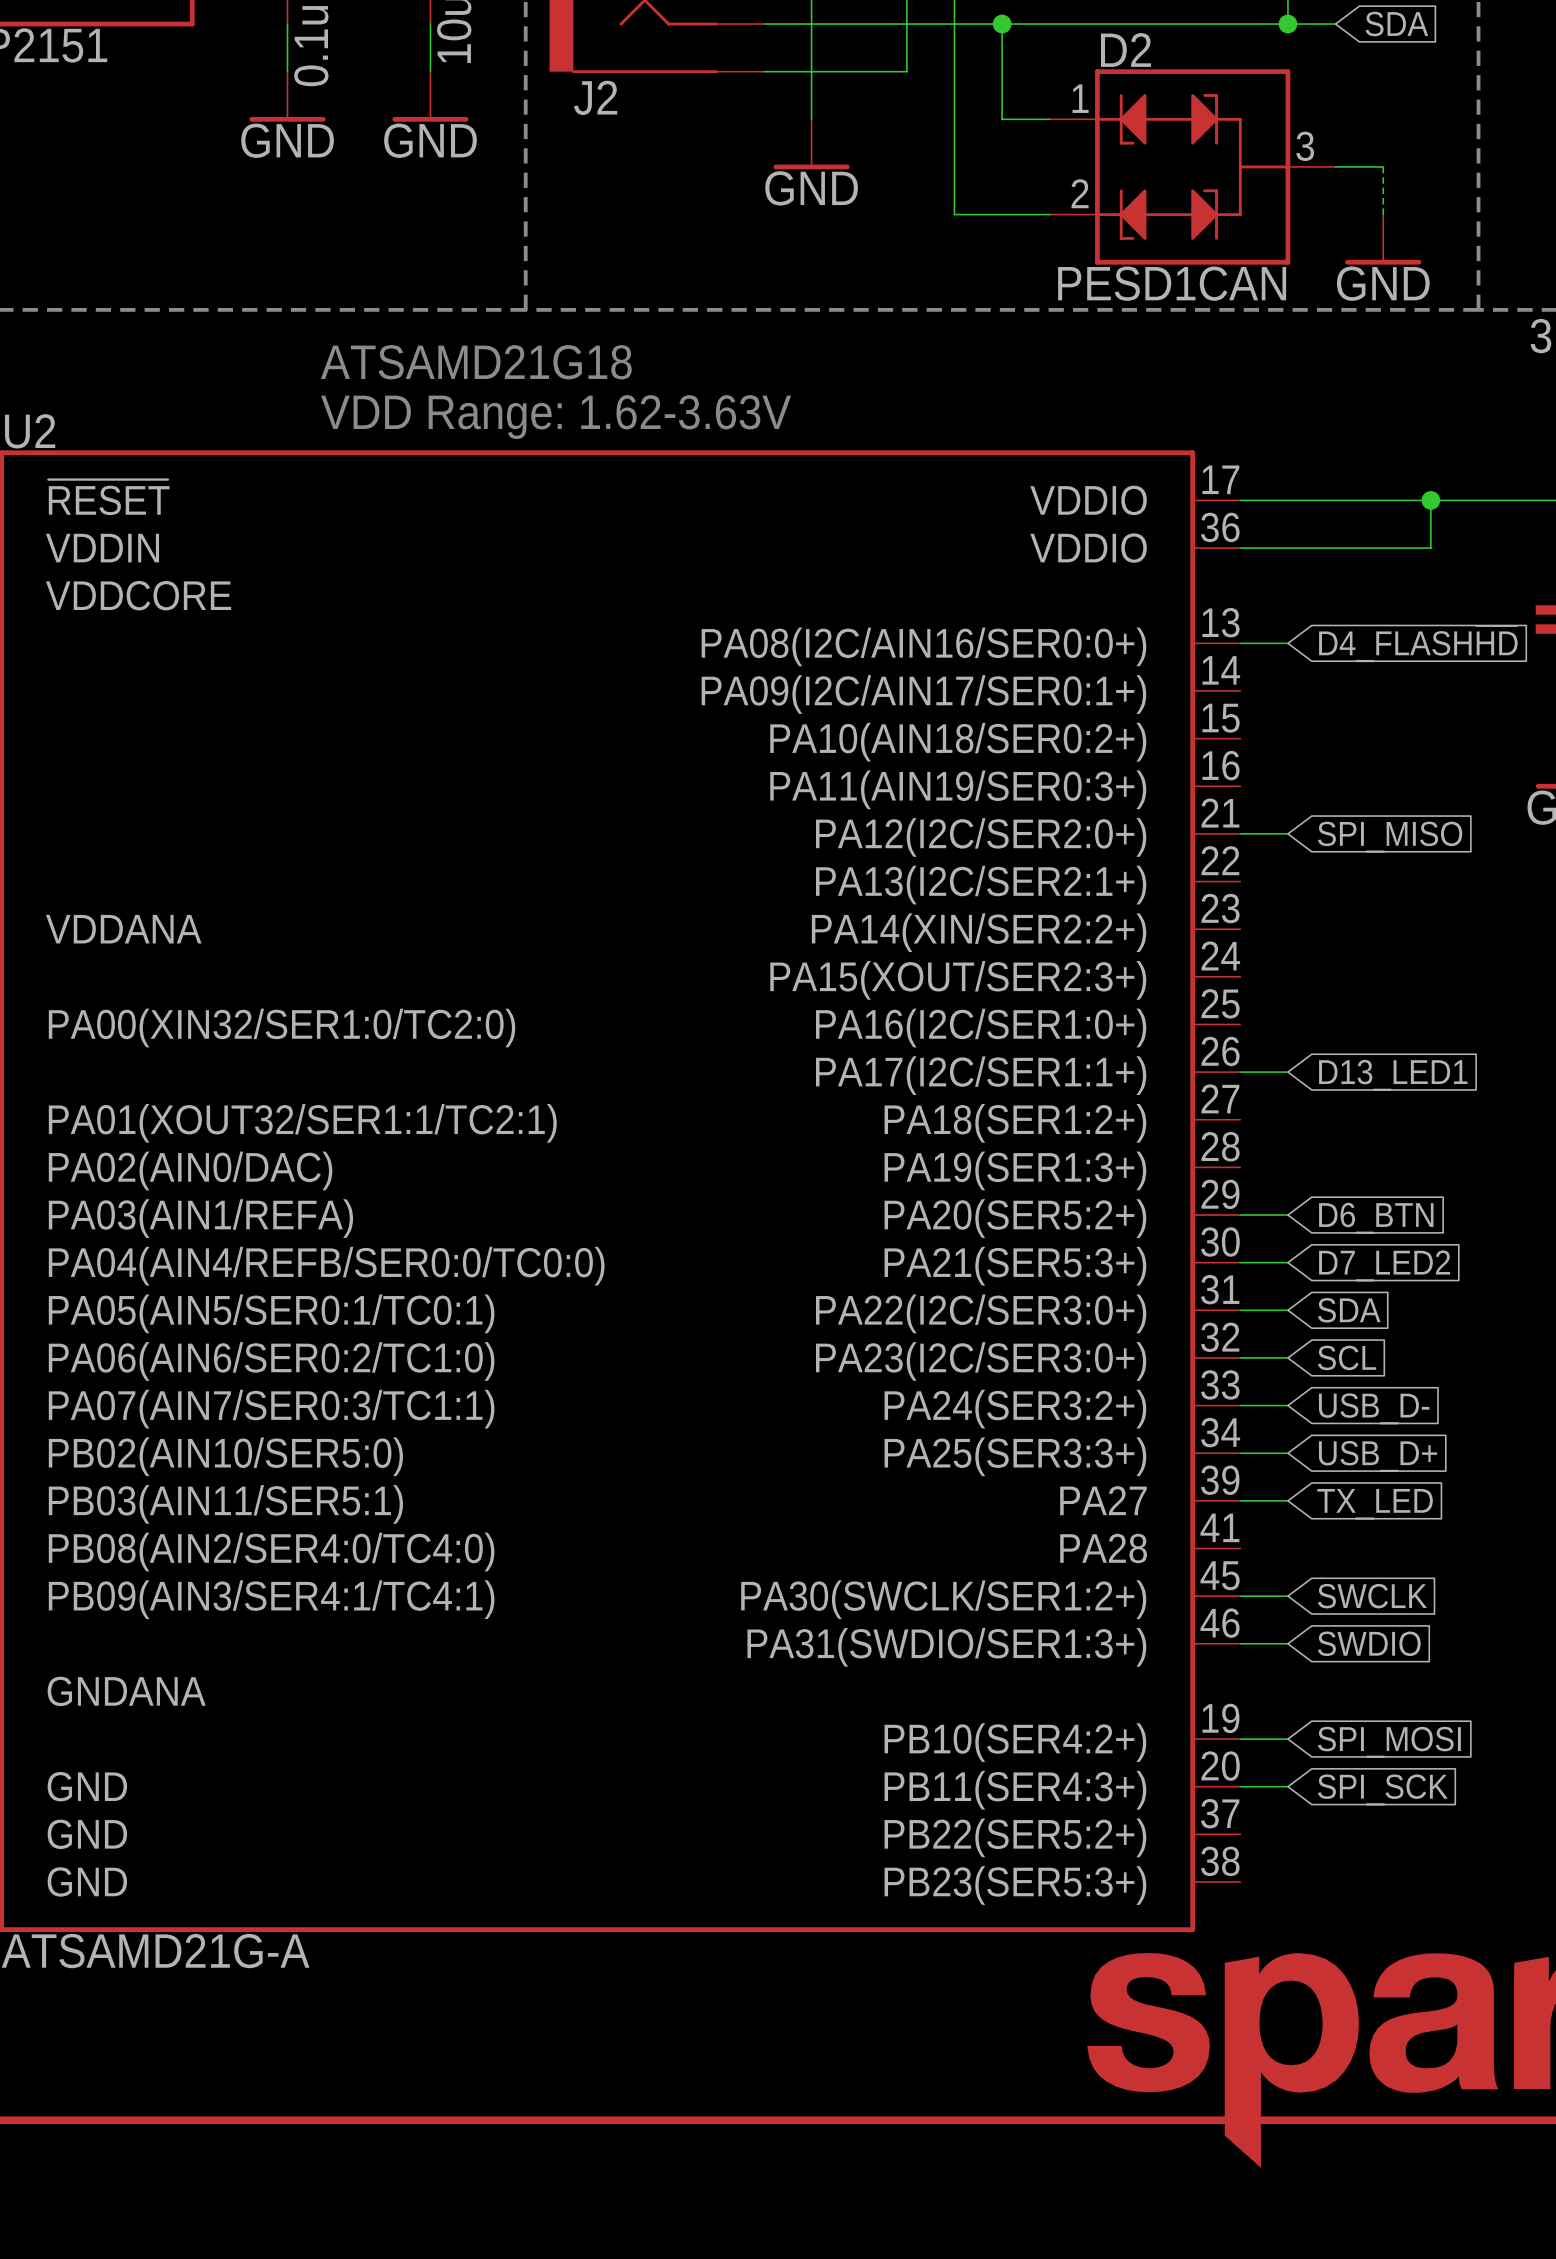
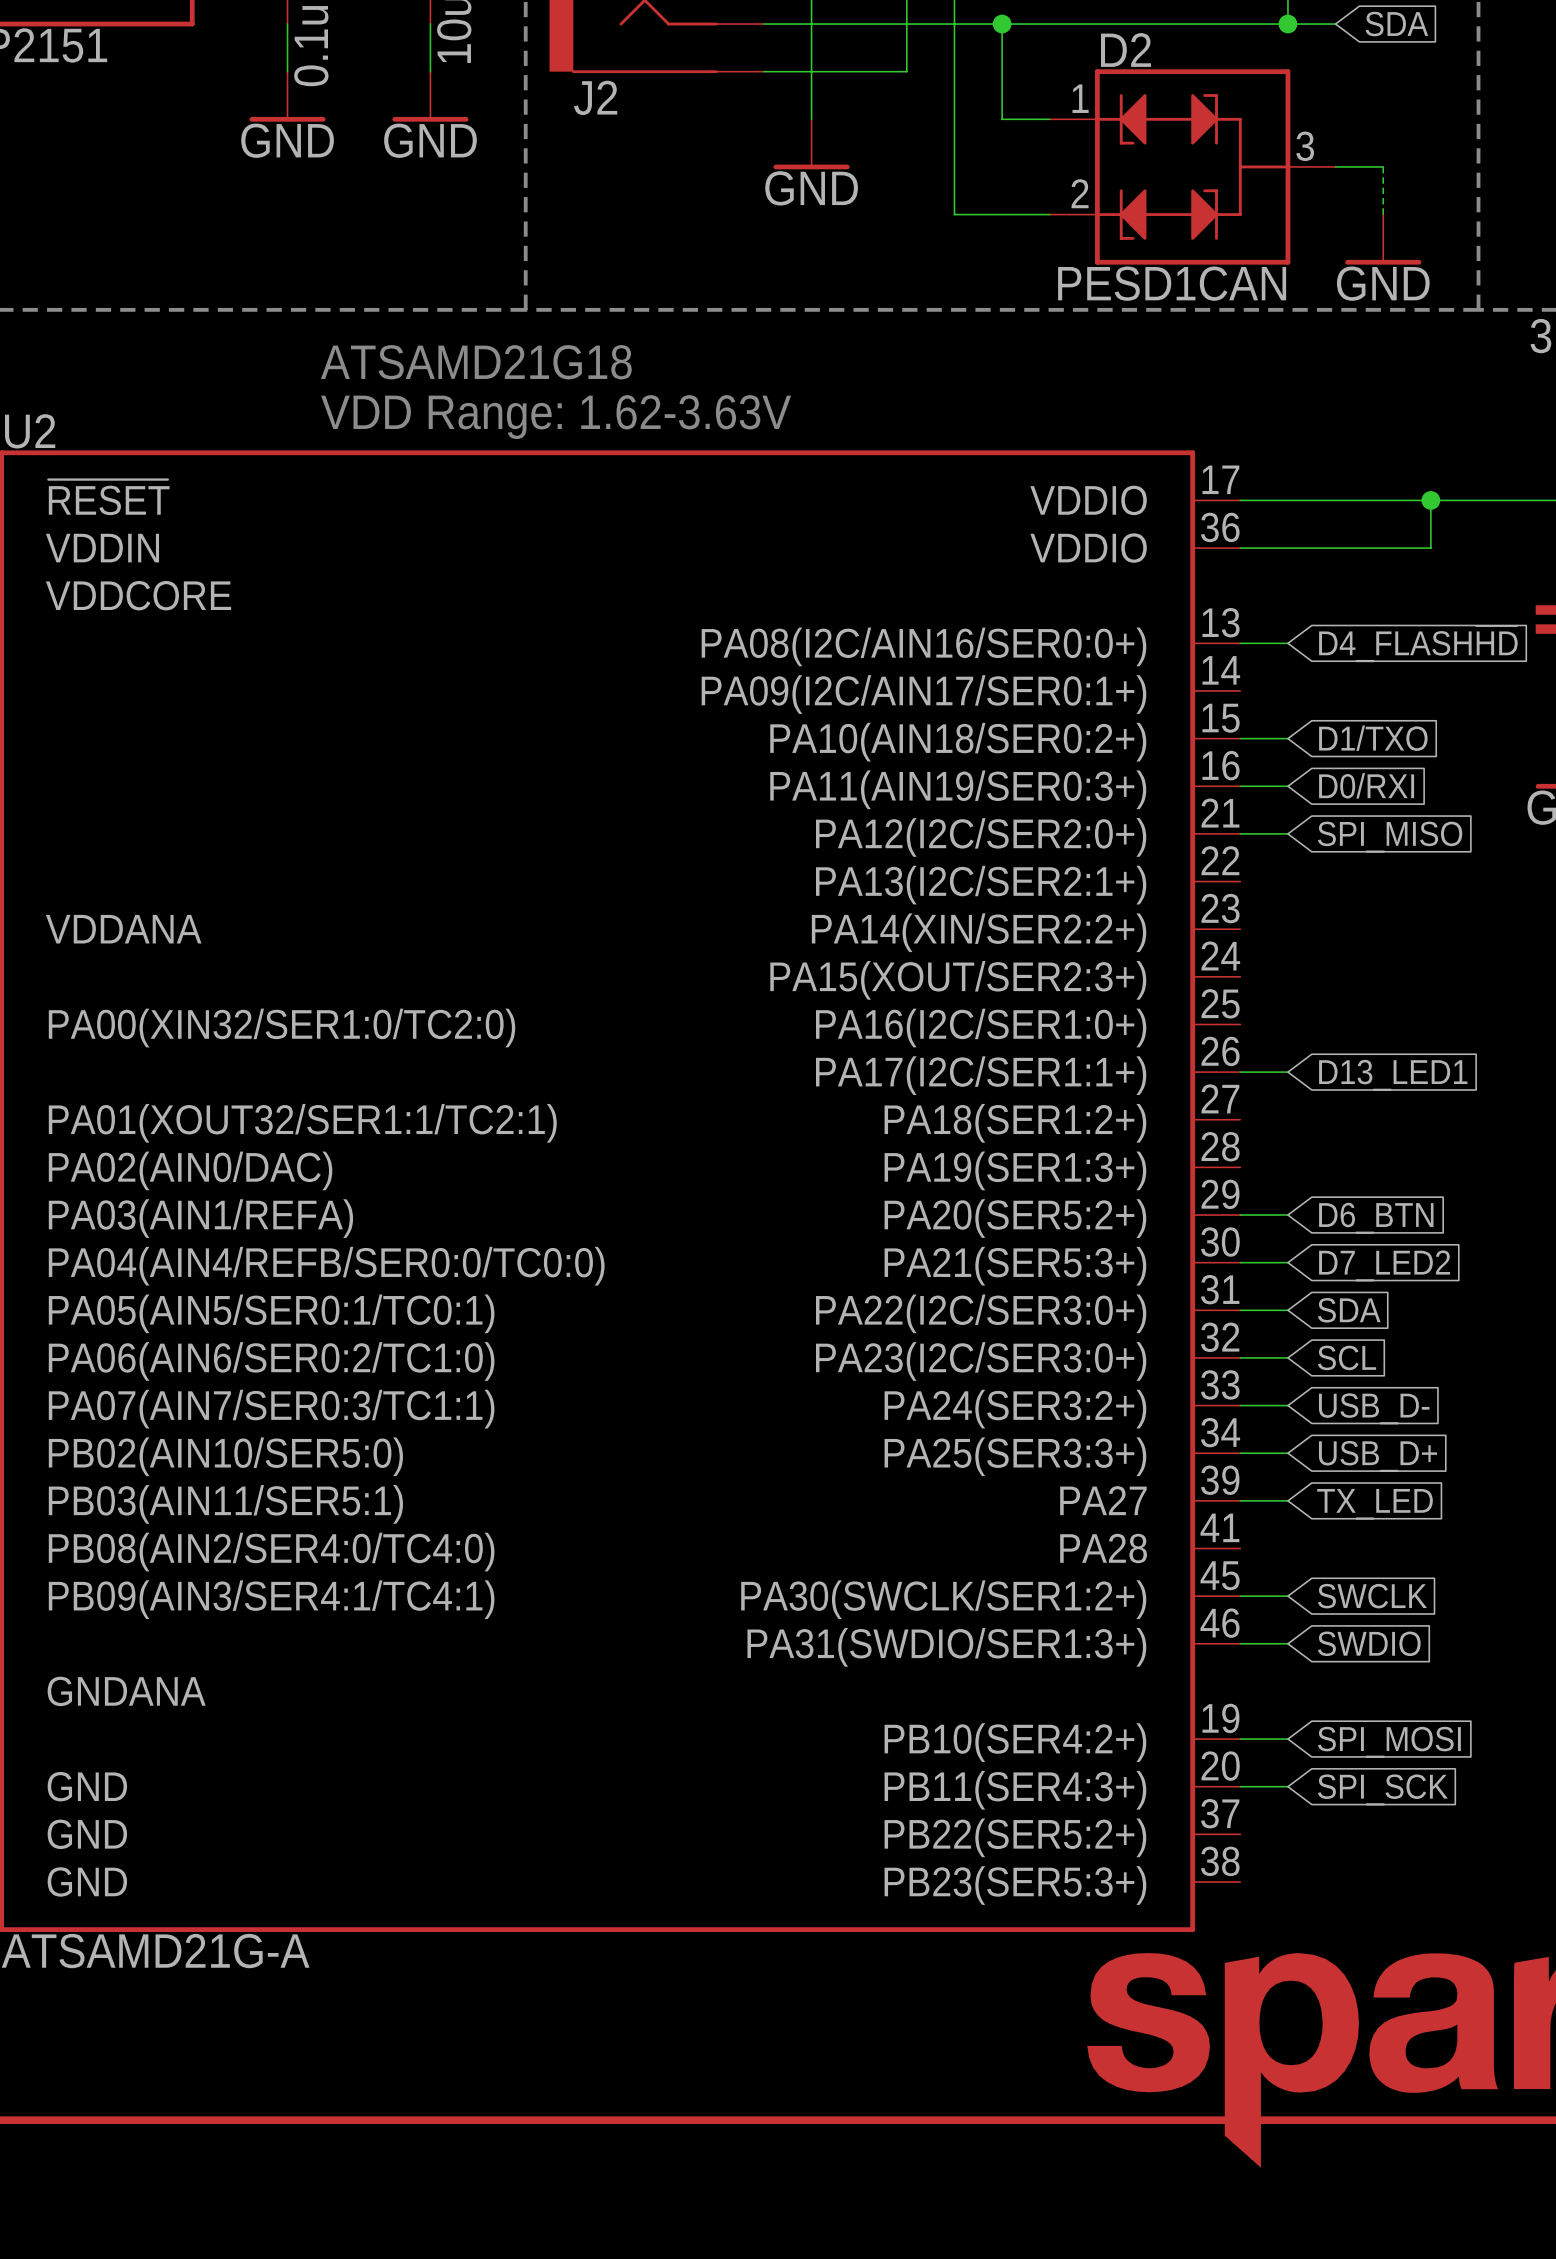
wire: none -> (1240, 738) (1287, 738)
global label: none -> D1/TXO (1373, 738)
global label: none -> D0/RXI (1366, 785)
wire: none -> (1240, 786) (1287, 786)

